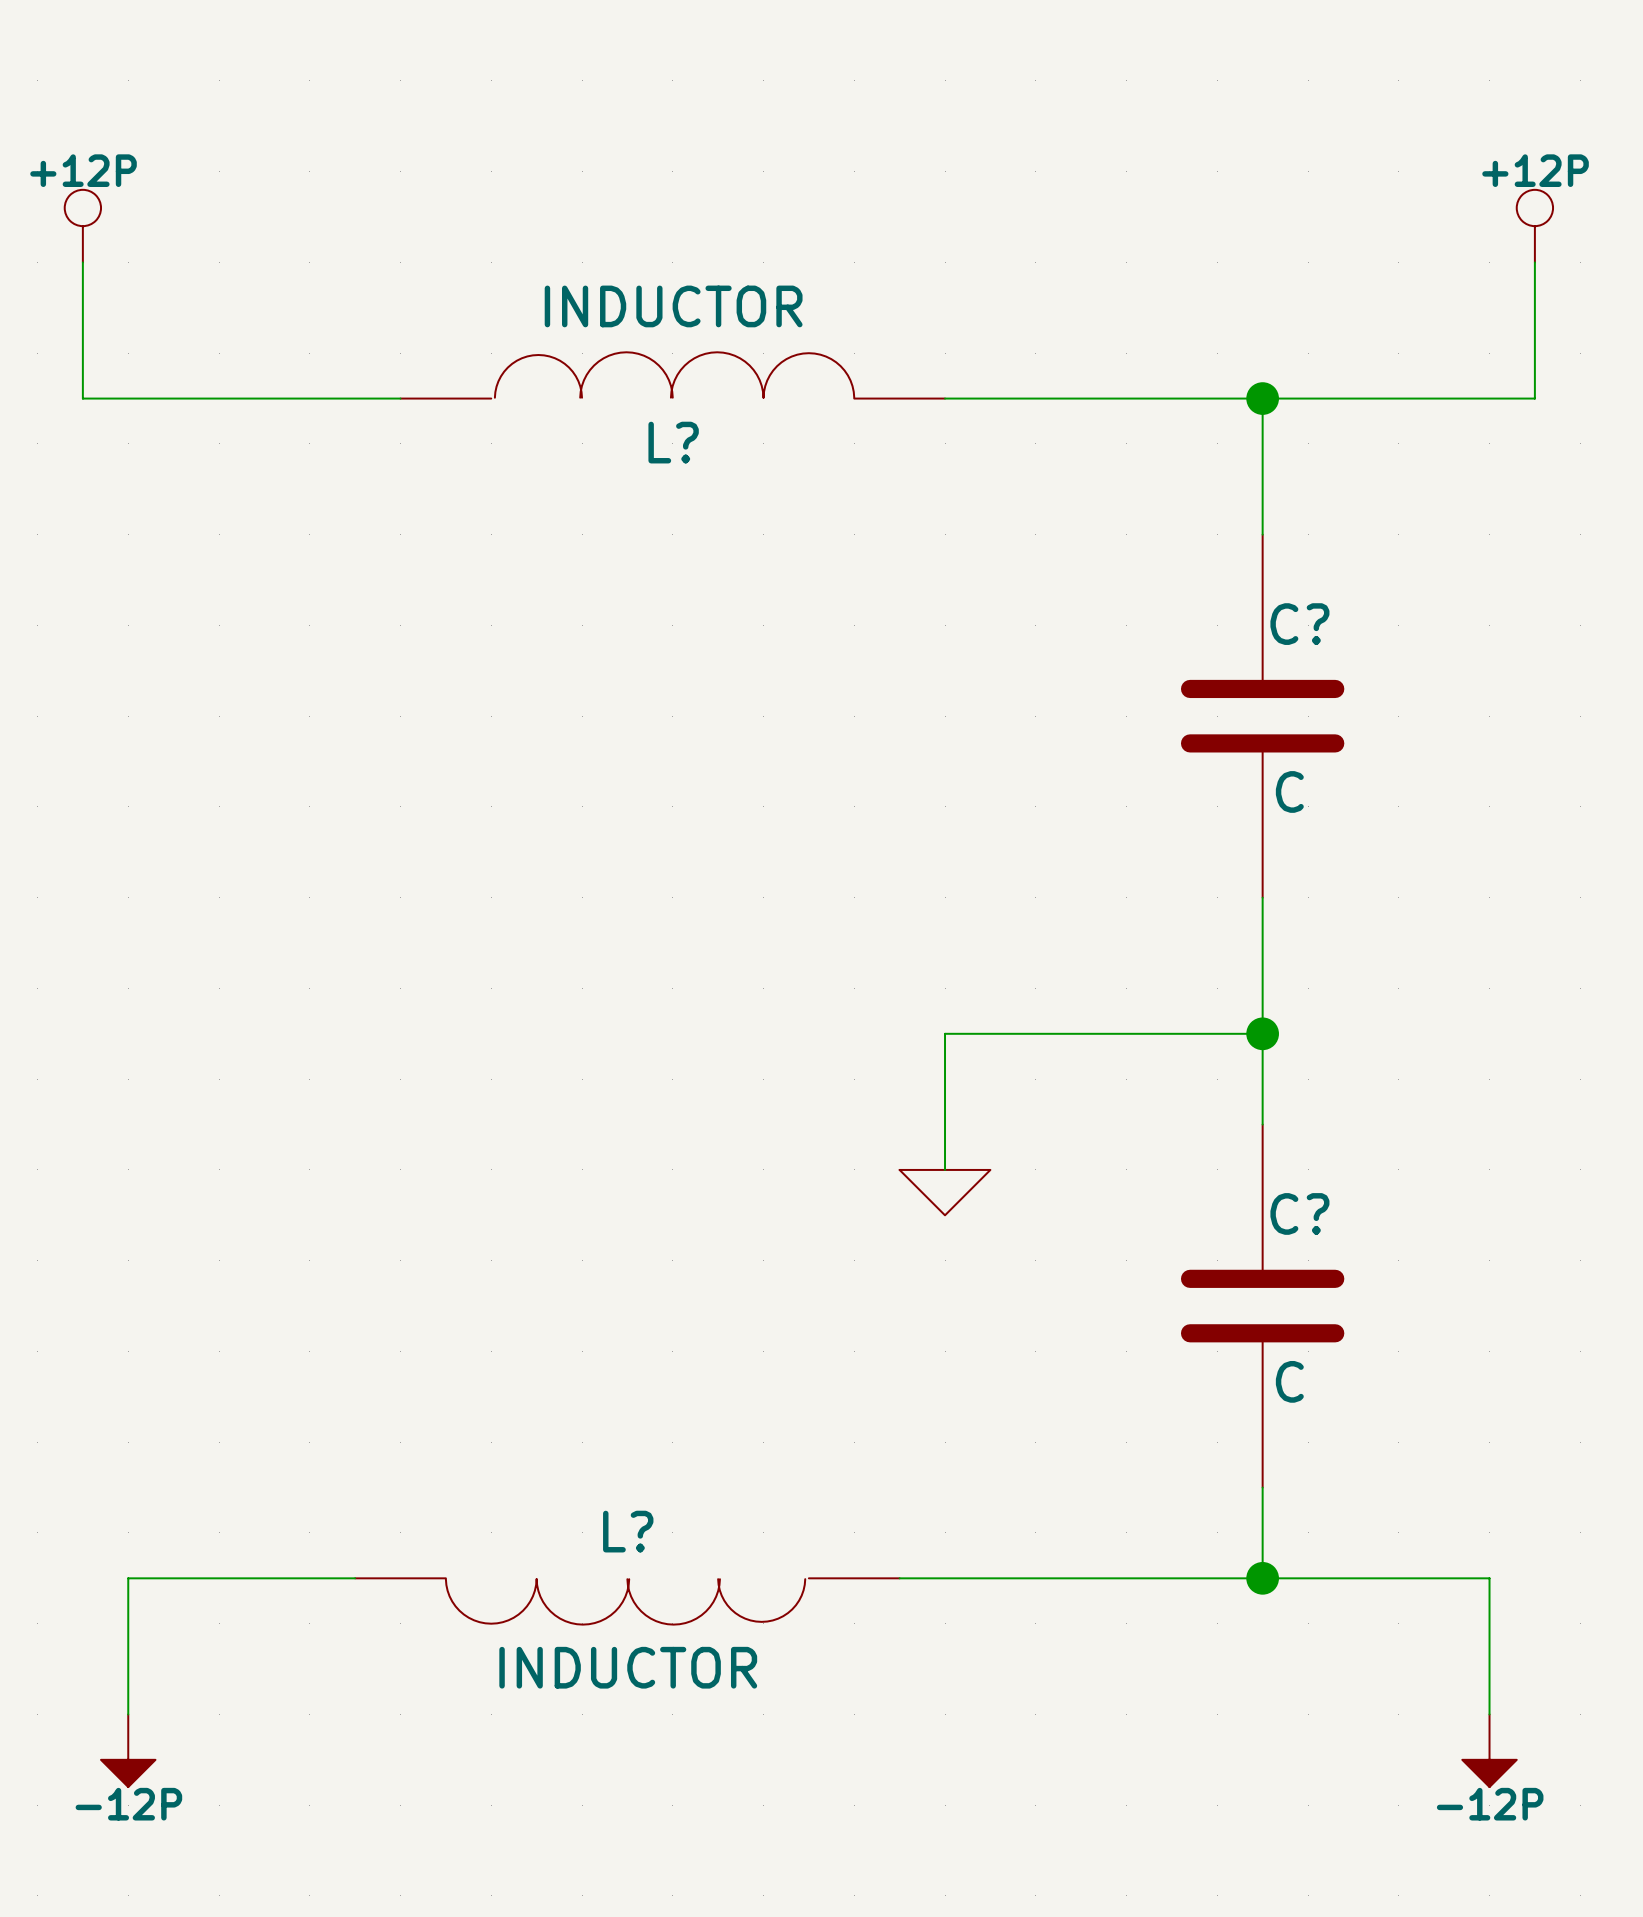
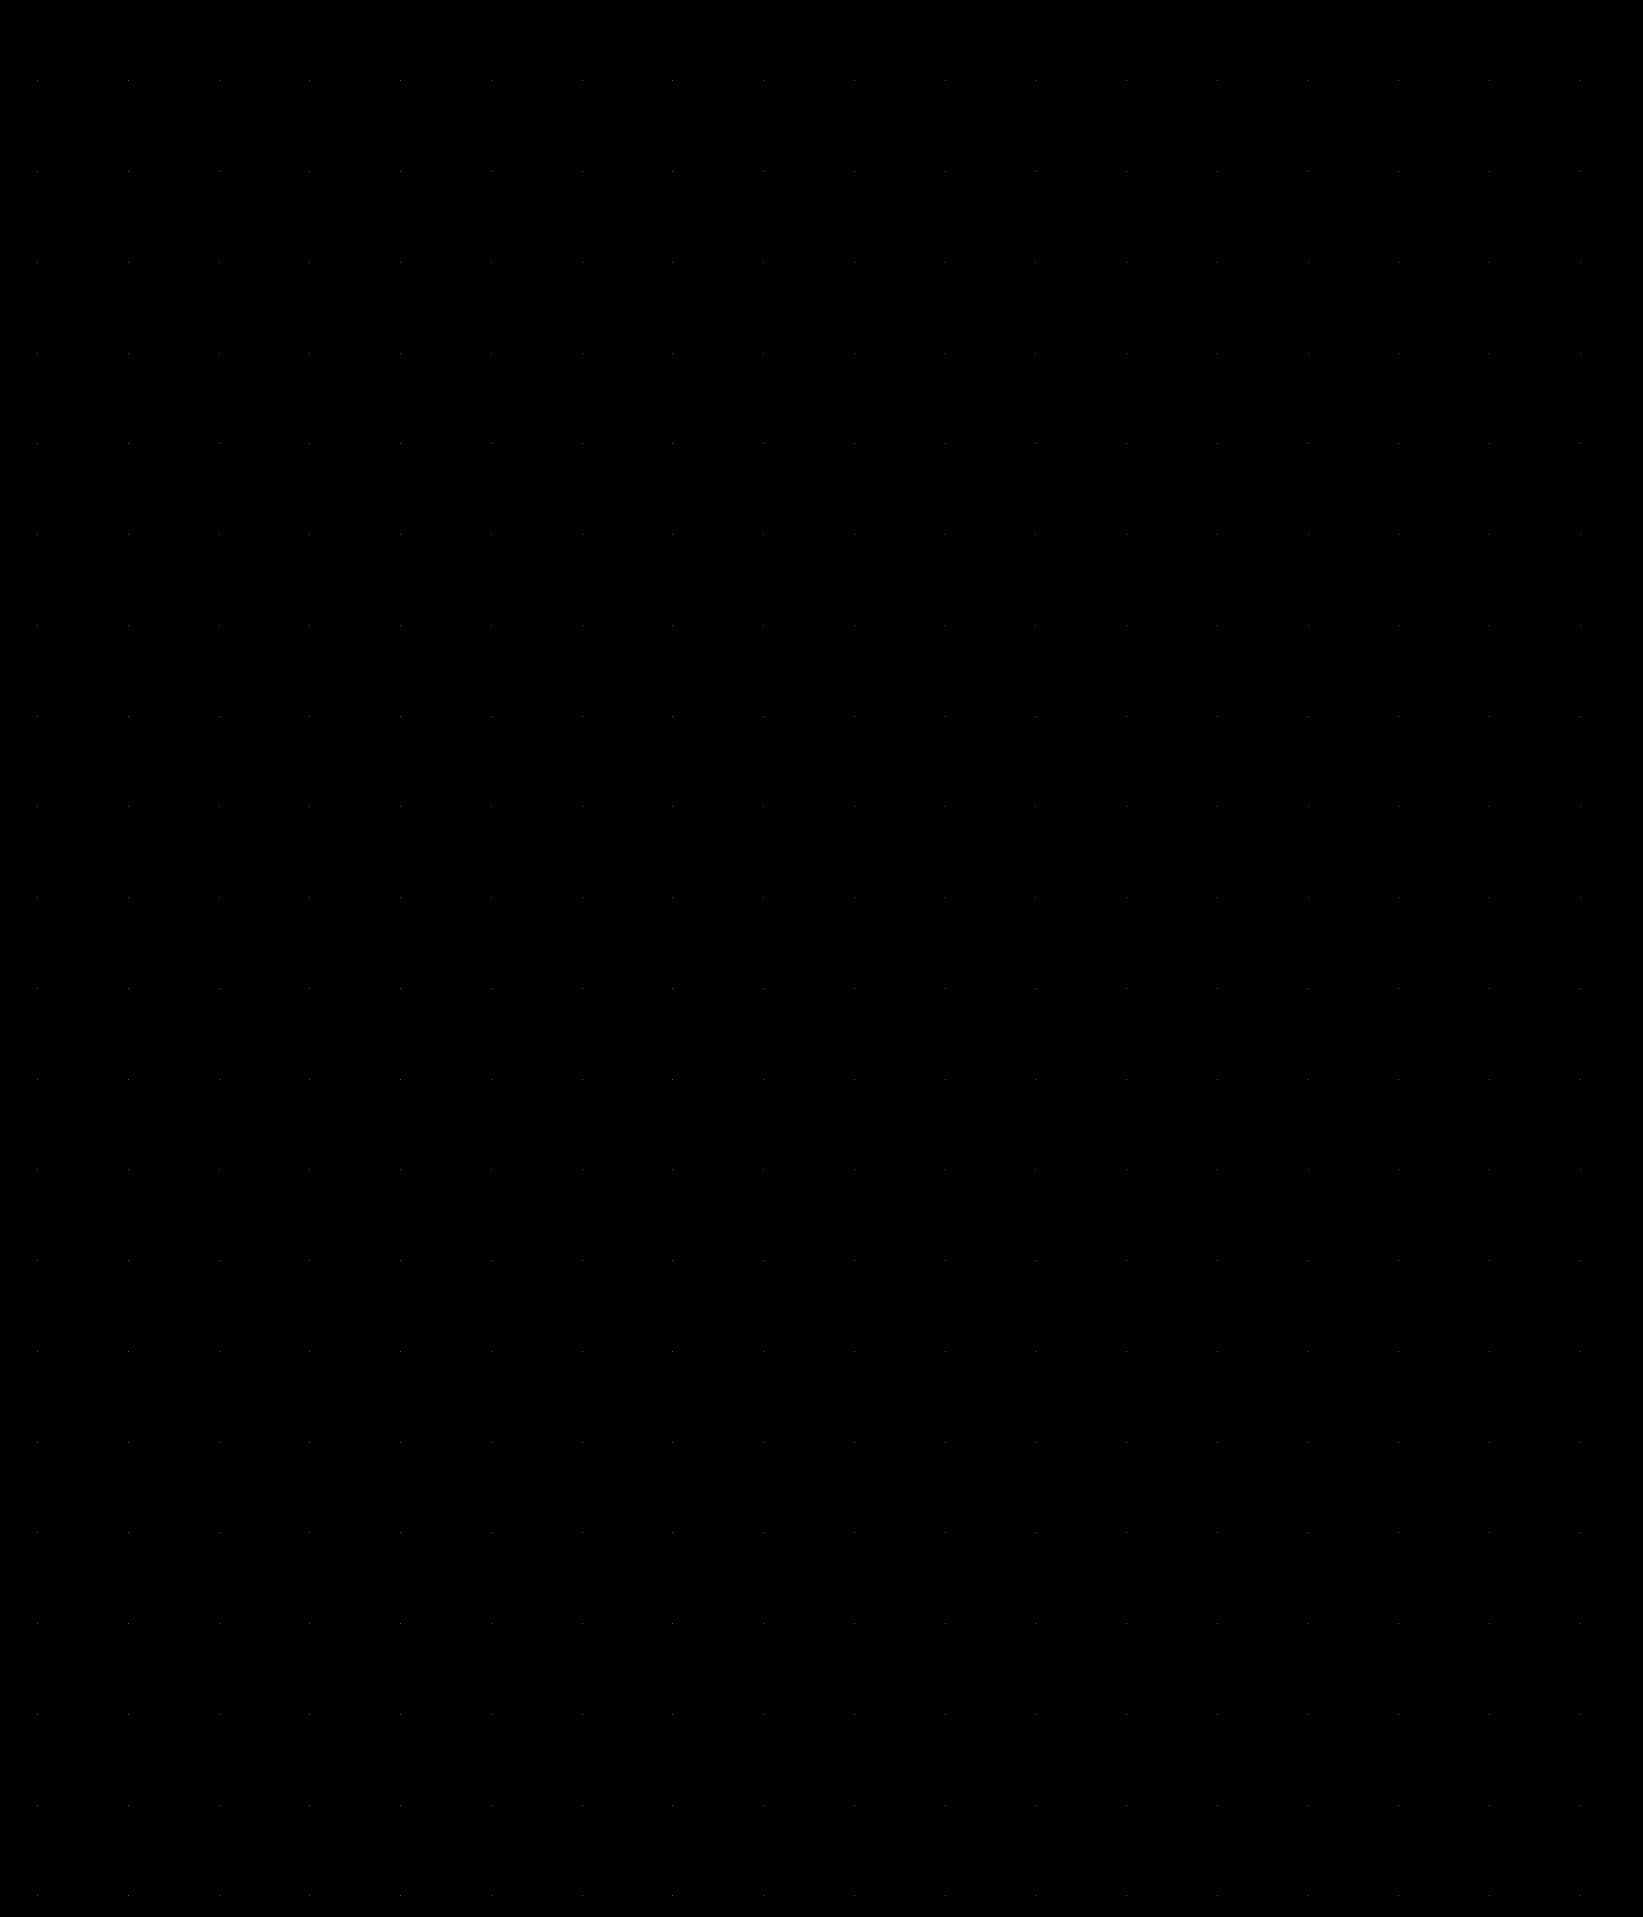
power symbol: +12P (82, 226) -> none
power symbol: +12P (1534, 226) -> none
wire: (82, 262) (82, 398) (400, 398) -> none
wire: (1534, 262) (1534, 398) (945, 398) -> none
L?: INDUCTOR (672, 375) -> none
wire: (1262, 398) (1262, 534) -> none
junction: (1262, 398) -> none
C?: C (1262, 716) -> none
wire: (1262, 897) (1262, 1124) -> none
wire: (1262, 1033) (945, 1033) (945, 1169) -> none
junction: (1262, 1033) -> none
power symbol: (945, 1192) -> none
C?: C (1262, 1306) -> none
wire: (1262, 1487) (1262, 1578) -> none
wire: (355, 1578) (128, 1578) (128, 1714) -> none
wire: (899, 1578) (1489, 1578) (1489, 1714) -> none
junction: (1262, 1578) -> none
L?: INDUCTOR (627, 1601) -> none
power symbol: -12P (128, 1750) -> none
power symbol: -12P (1489, 1750) -> none

